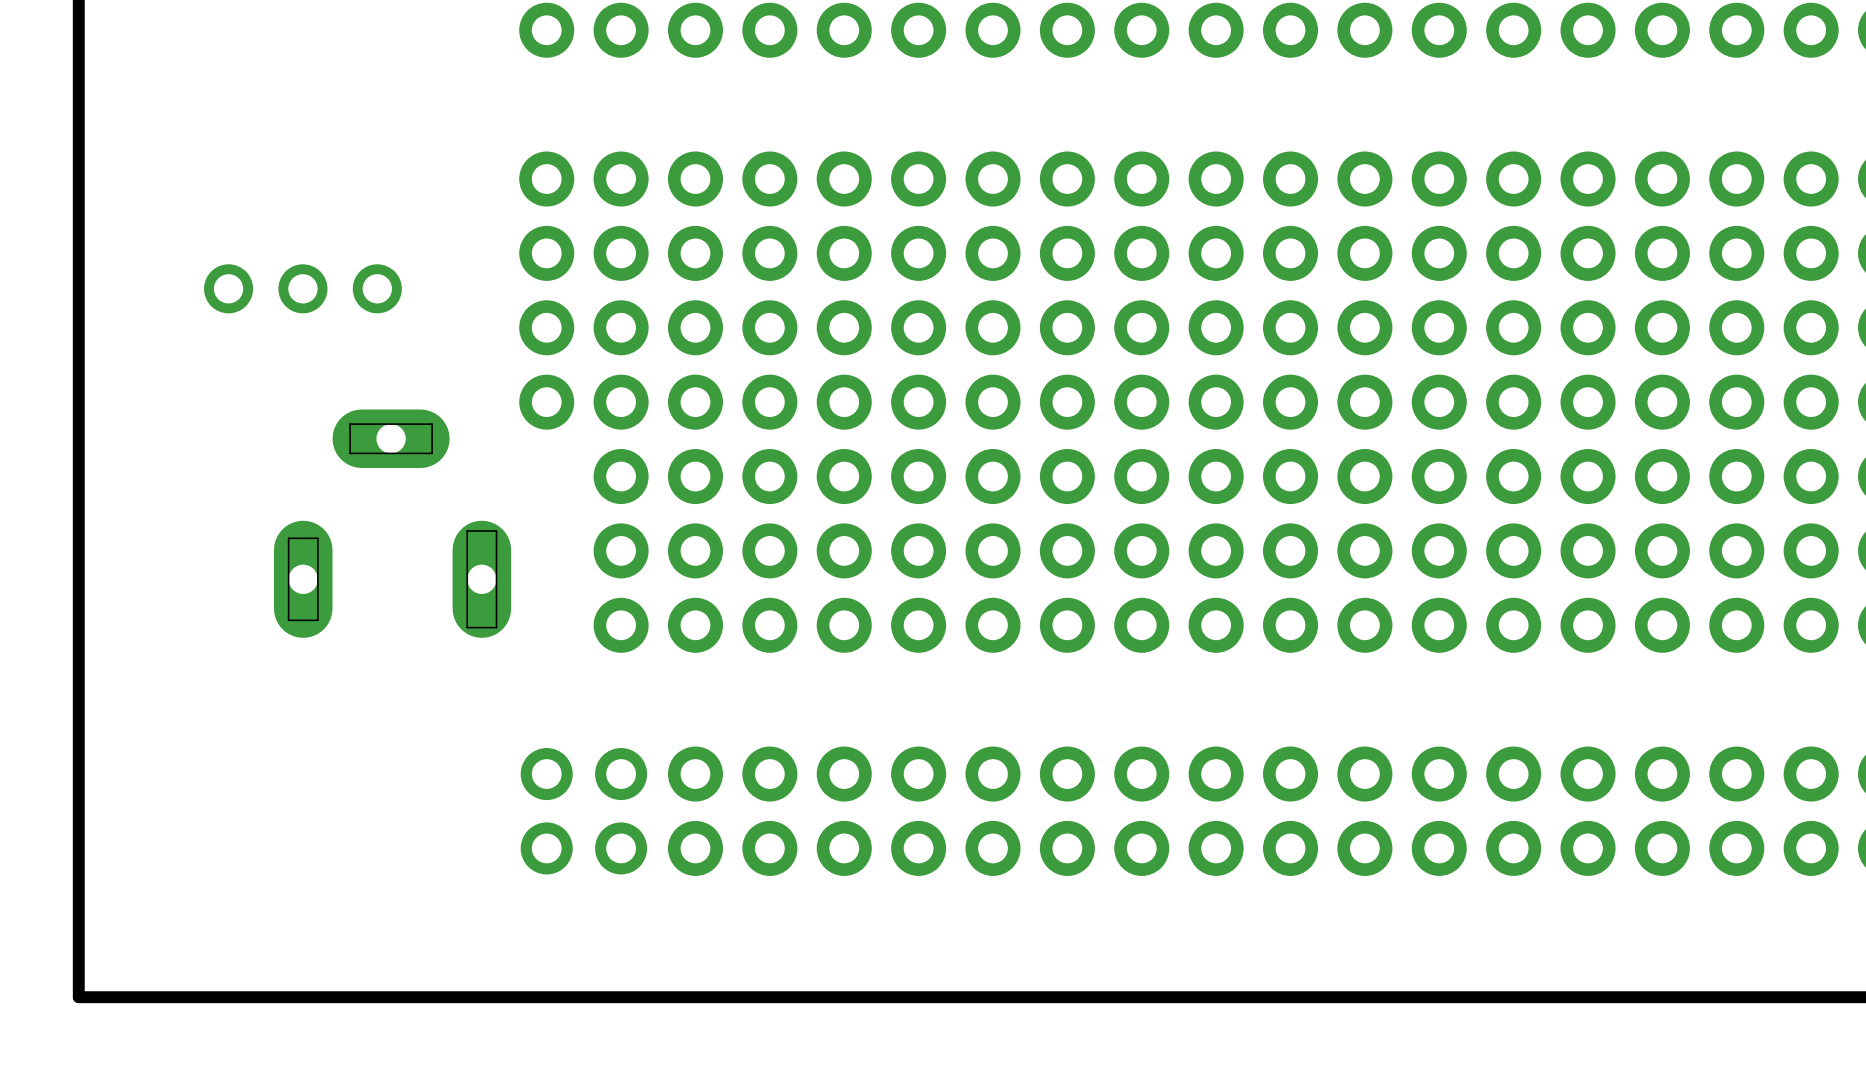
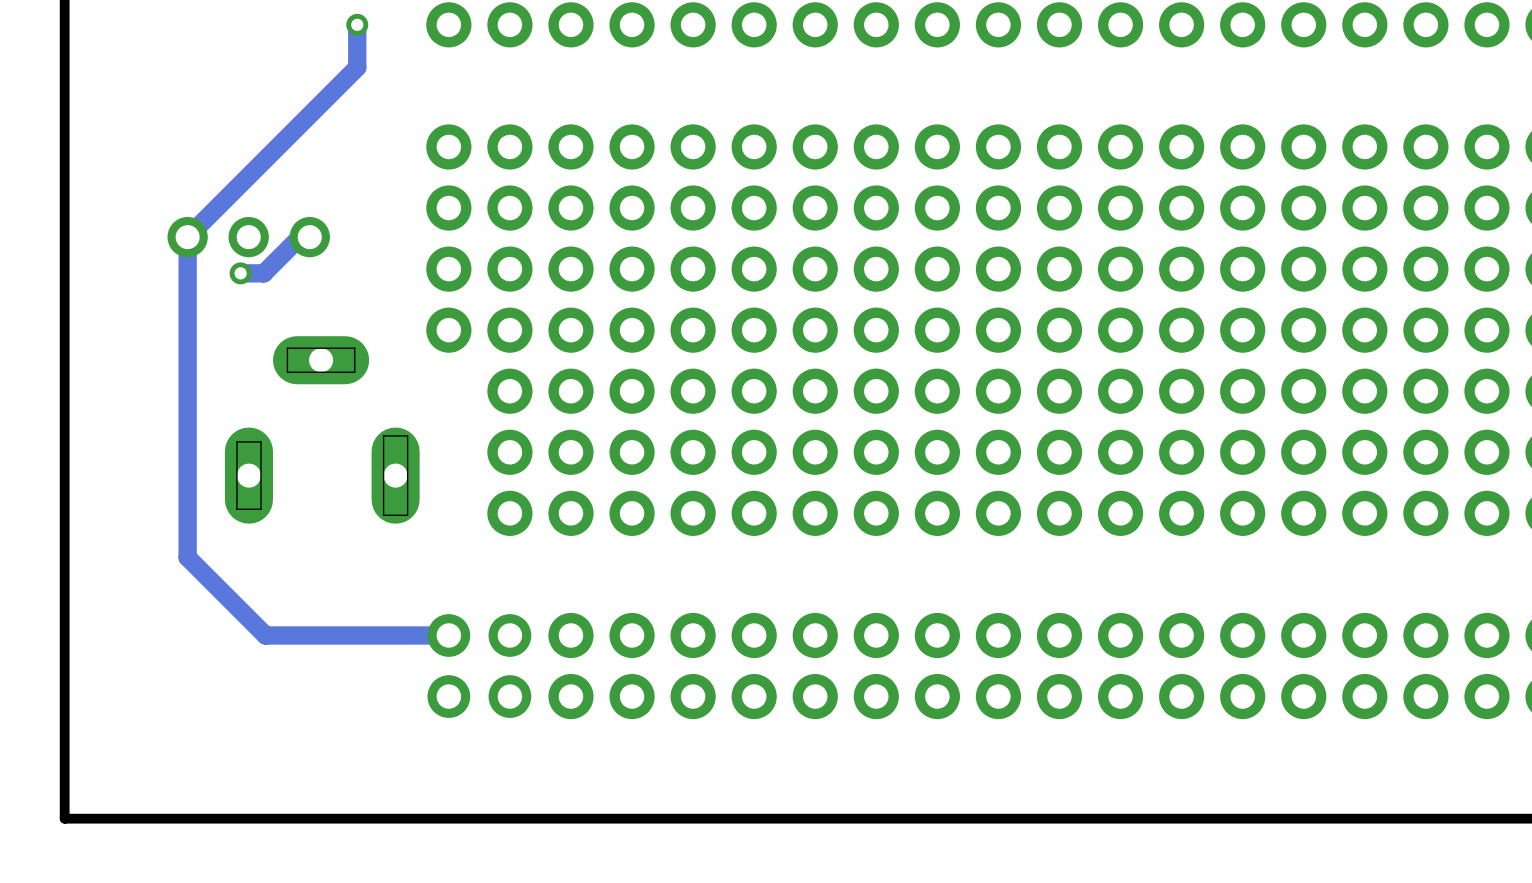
track: none -> (357, 24) (357, 67) (187, 237) (187, 557) (265, 635) (448, 635)
via: none -> (357, 24)
track: none -> (309, 237) (298, 238) (263, 273) (240, 273)
via: none -> (240, 273)

